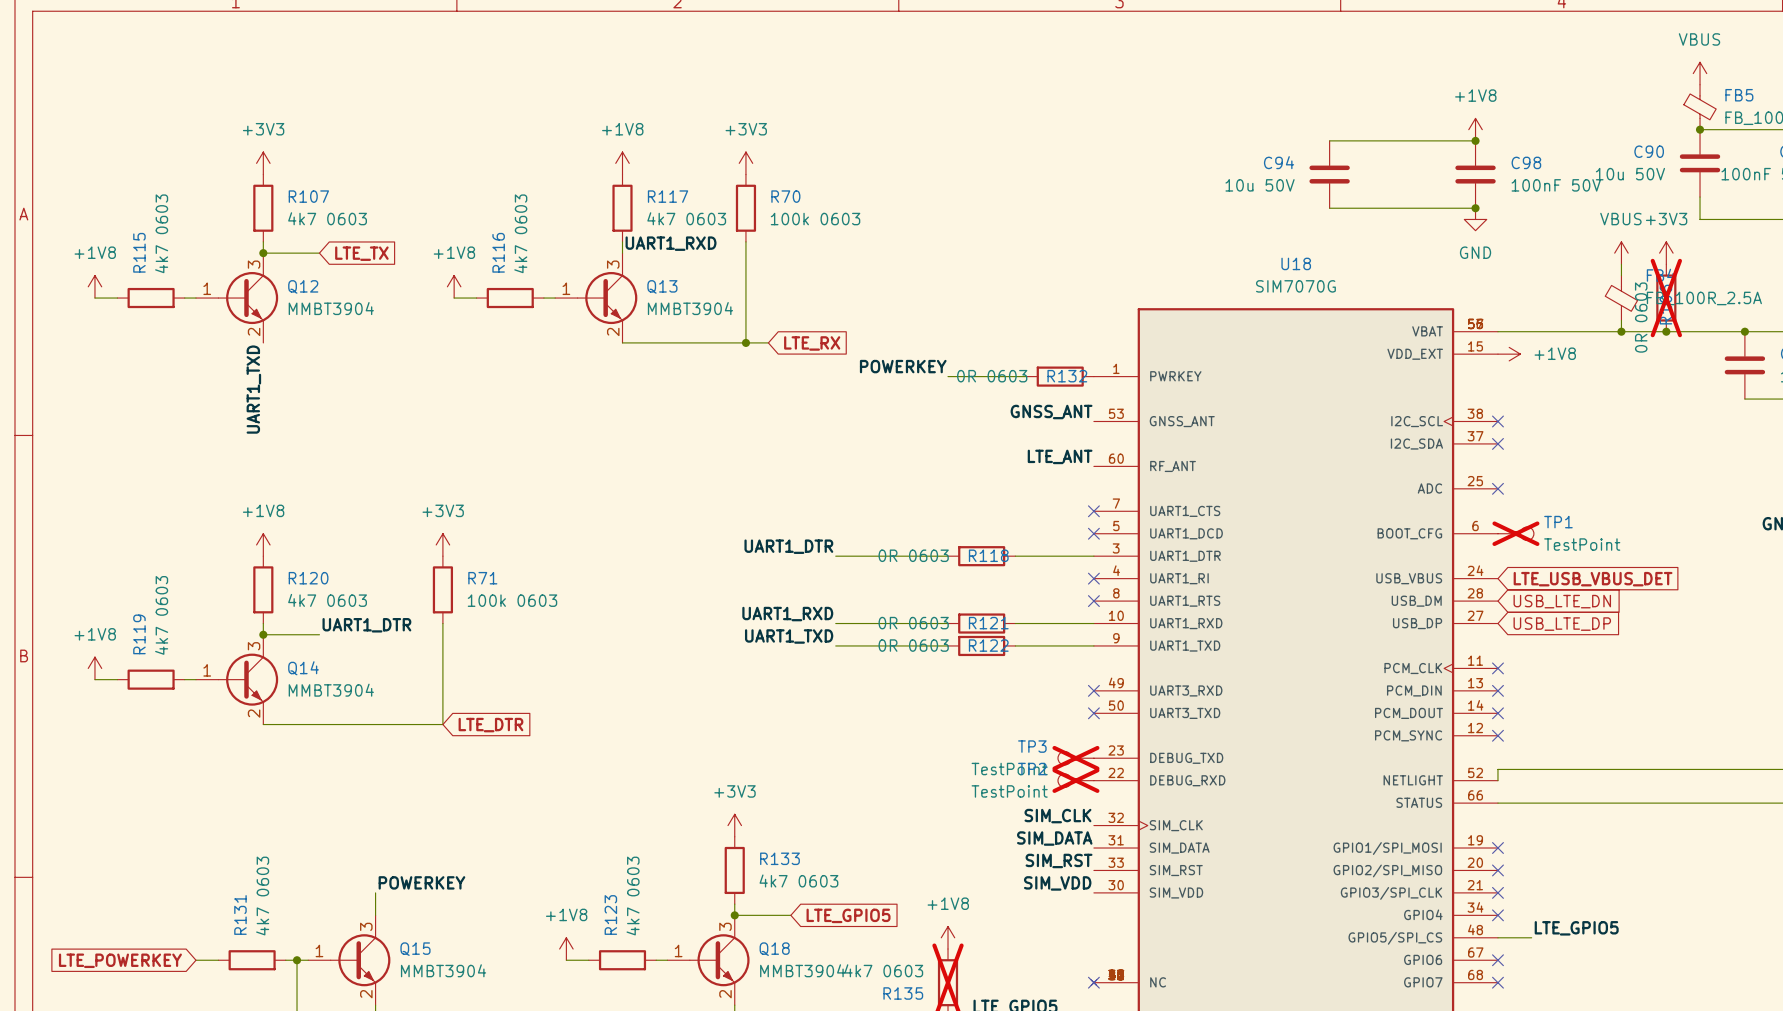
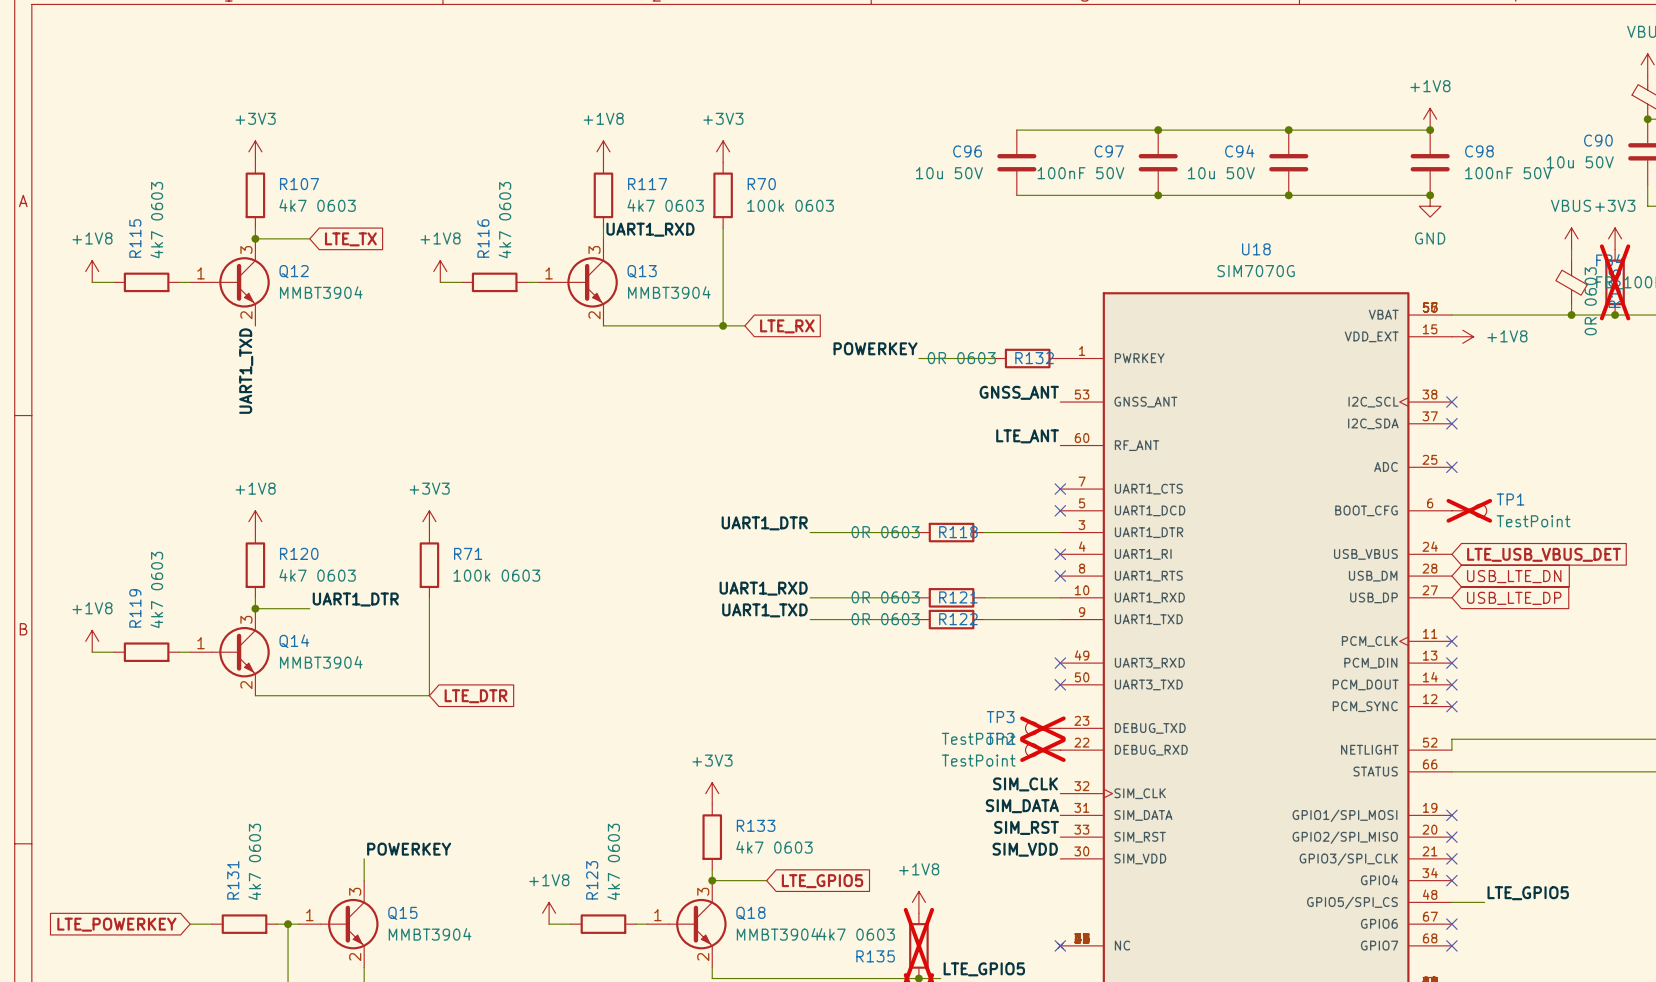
wire: none -> (1016, 130) (1288, 130)
junction: none -> (1158, 130)
junction: none -> (1288, 130)
C96: none -> 10u 50V (1016, 162)
C97: none -> 100nF 50V (1158, 162)
wire: none -> (1016, 195) (1288, 195)
junction: none -> (1158, 195)
junction: none -> (1288, 195)

